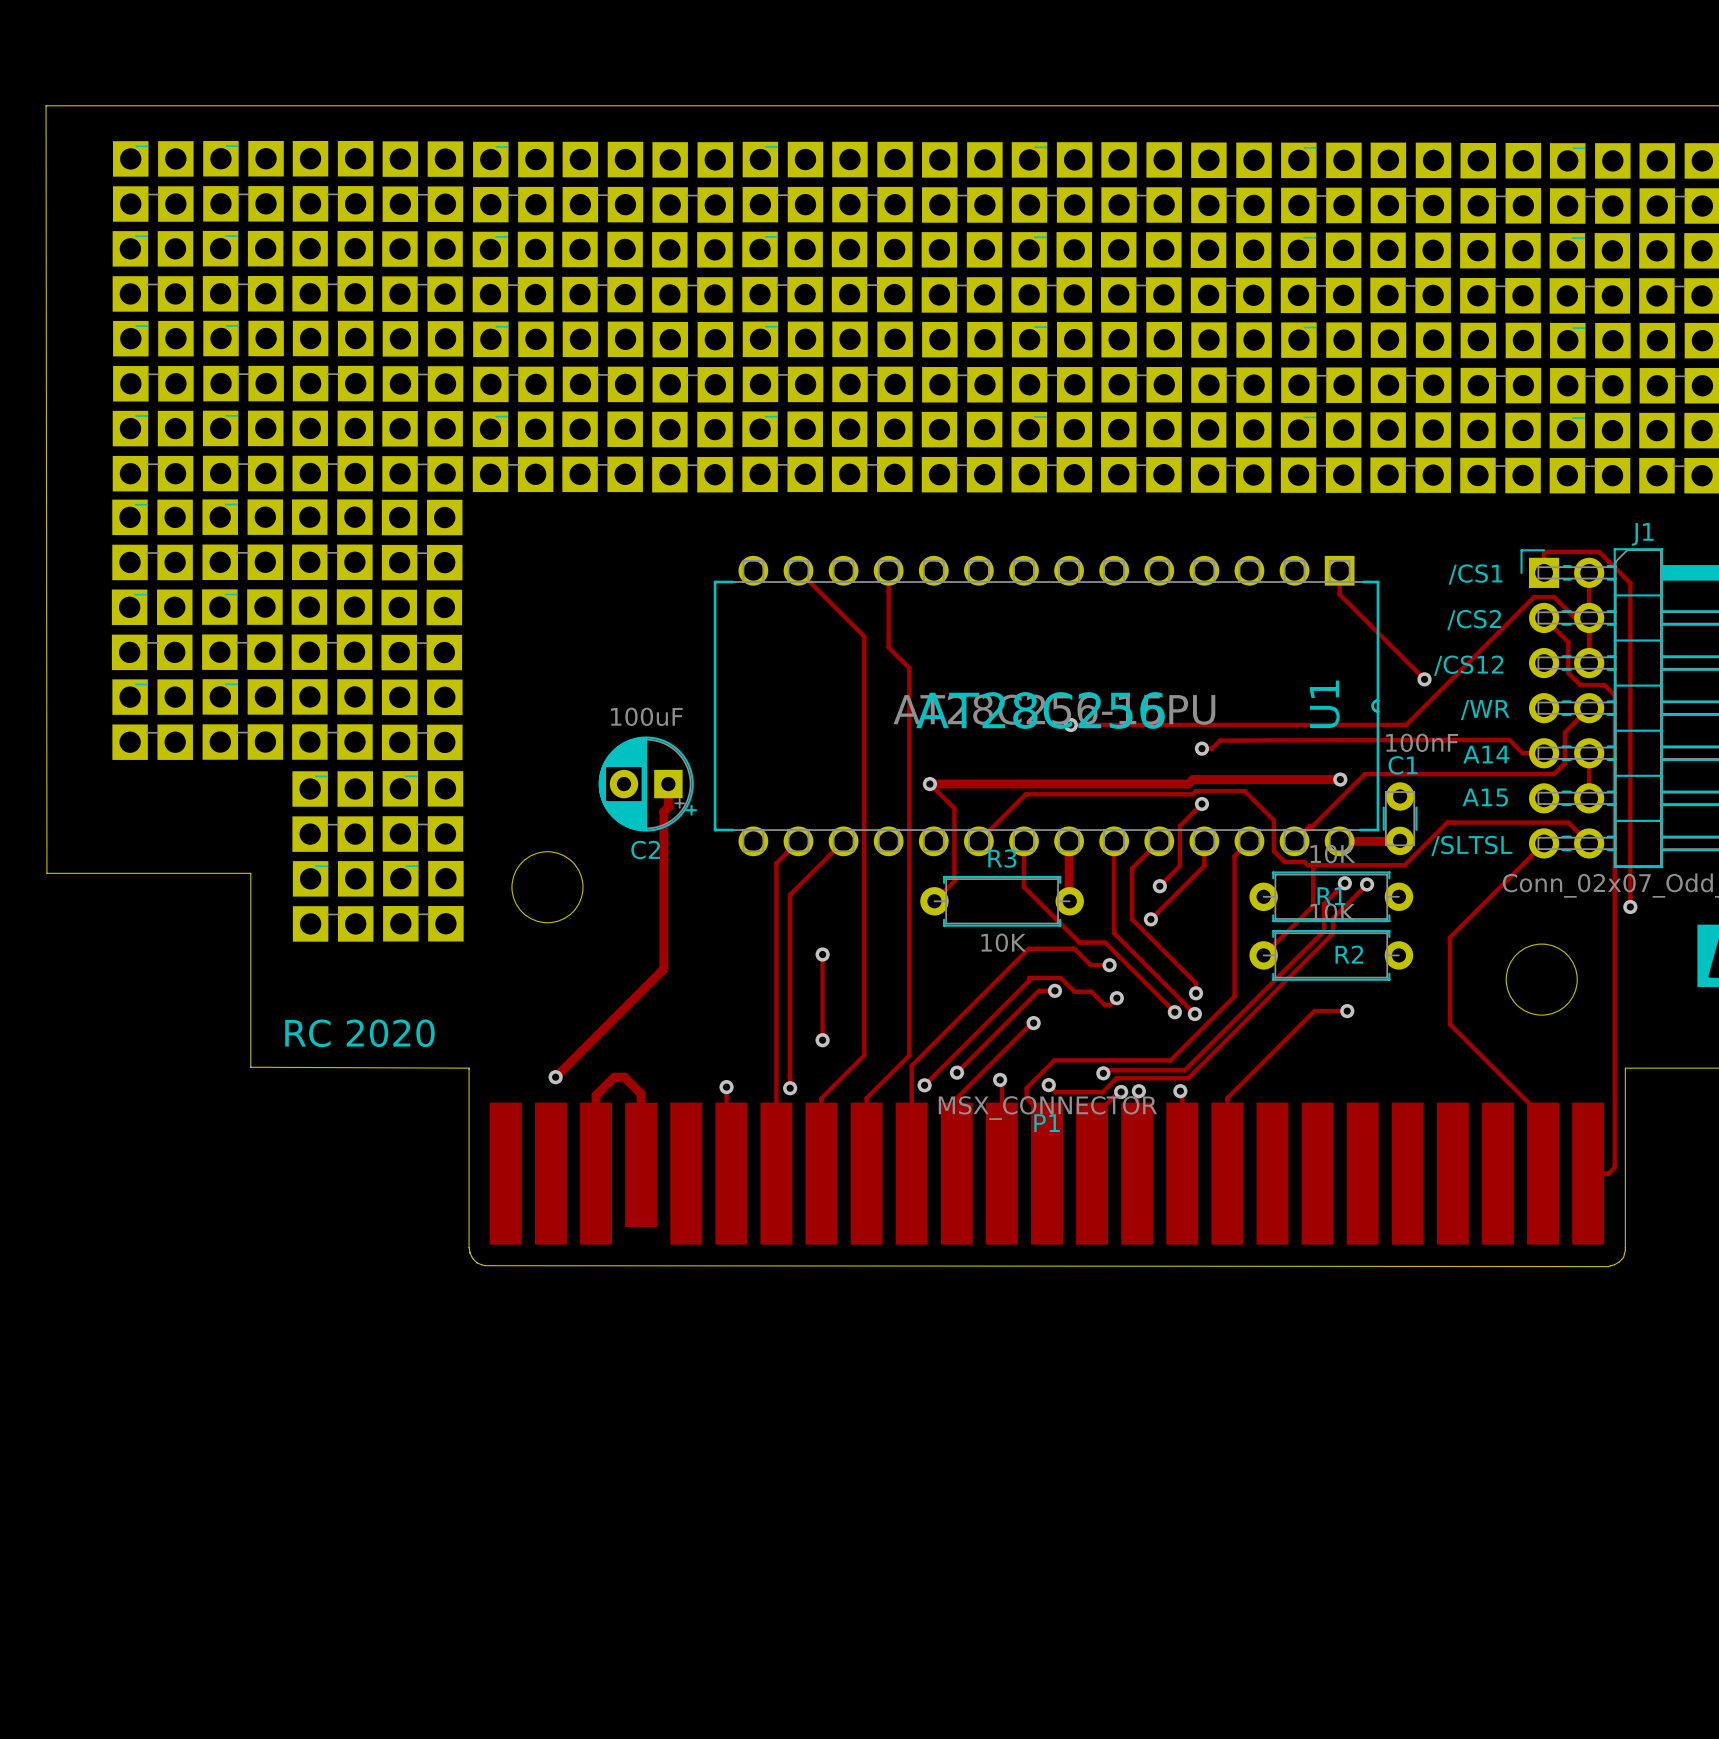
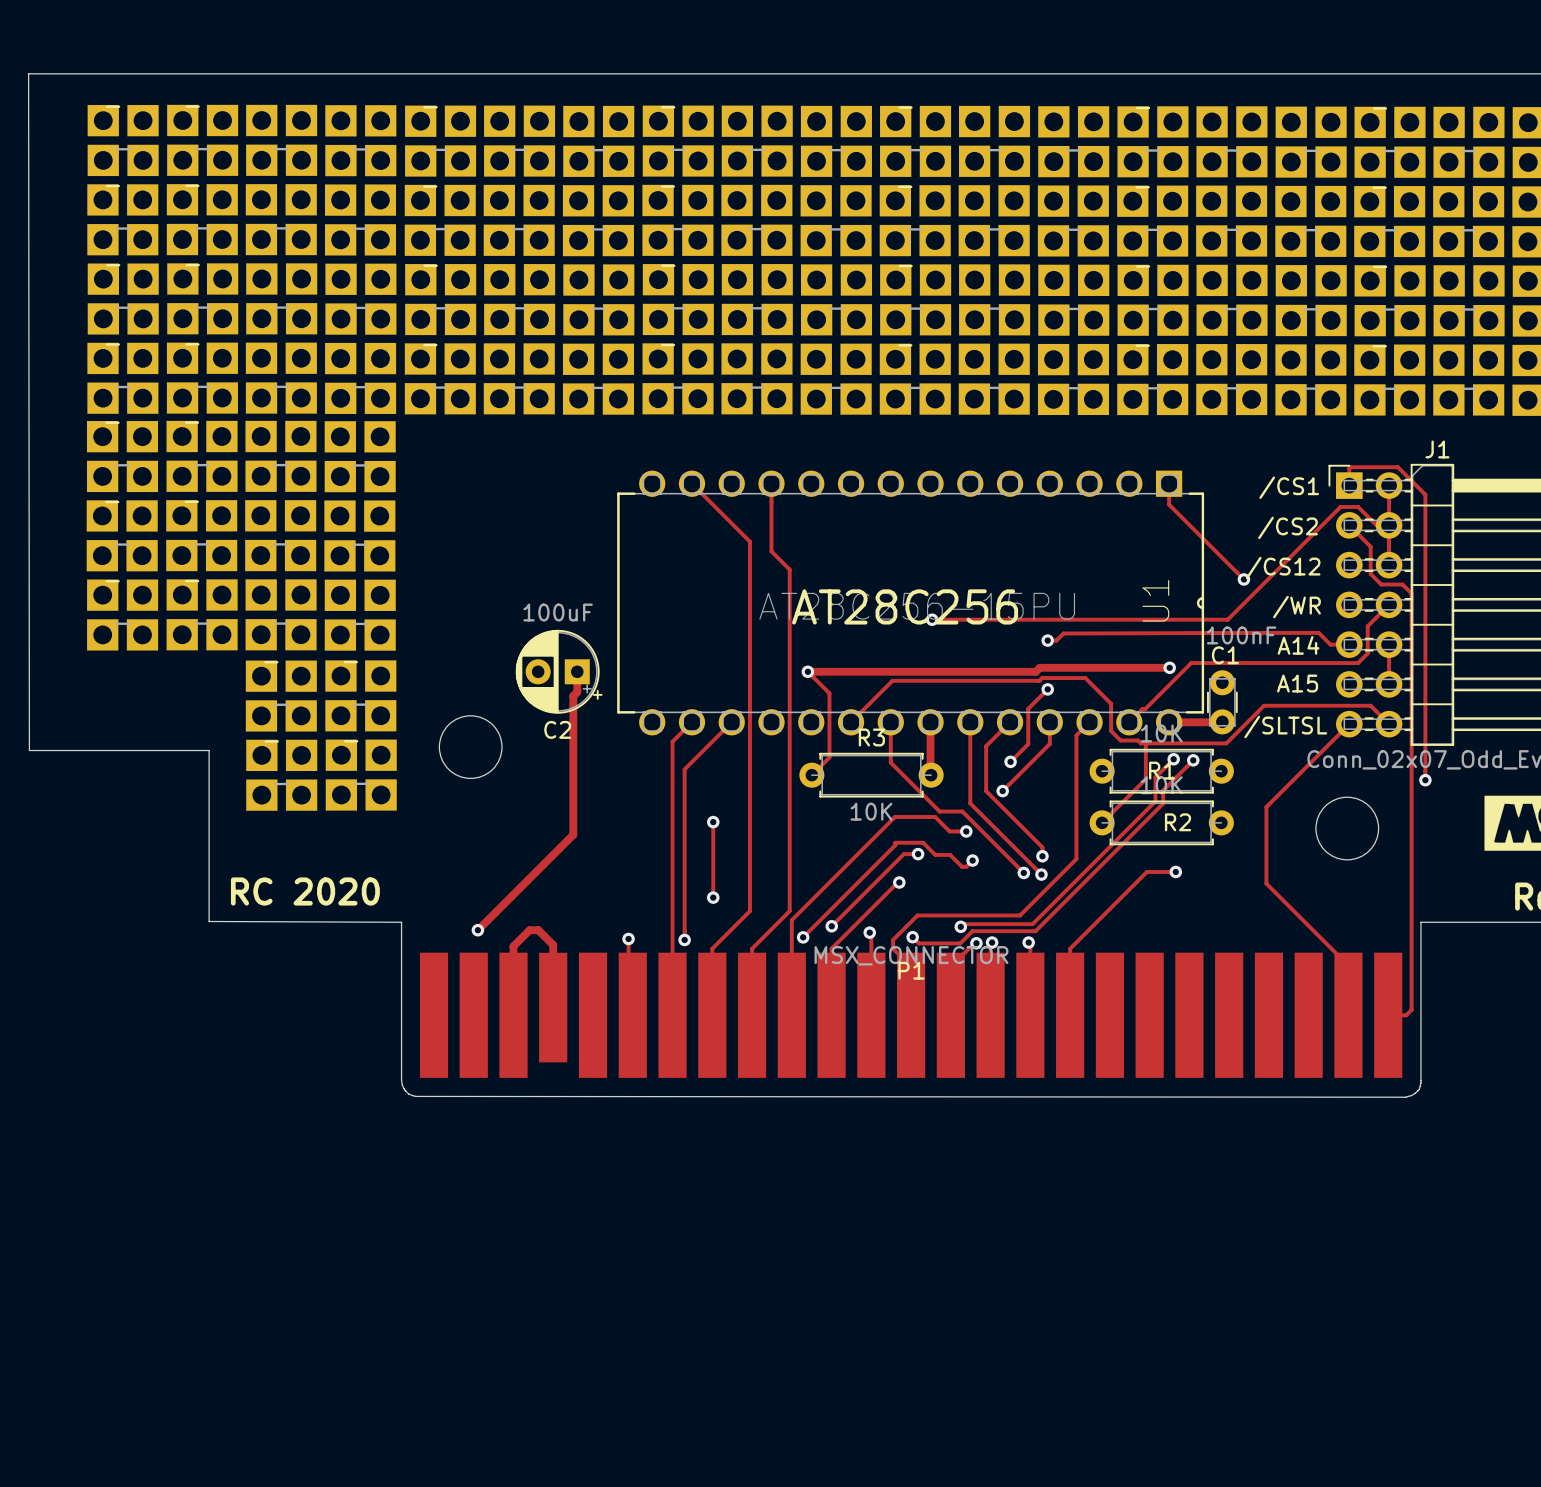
P1 footprint: [489, 851, 1605, 1245] -> [419, 715, 1403, 1078]

